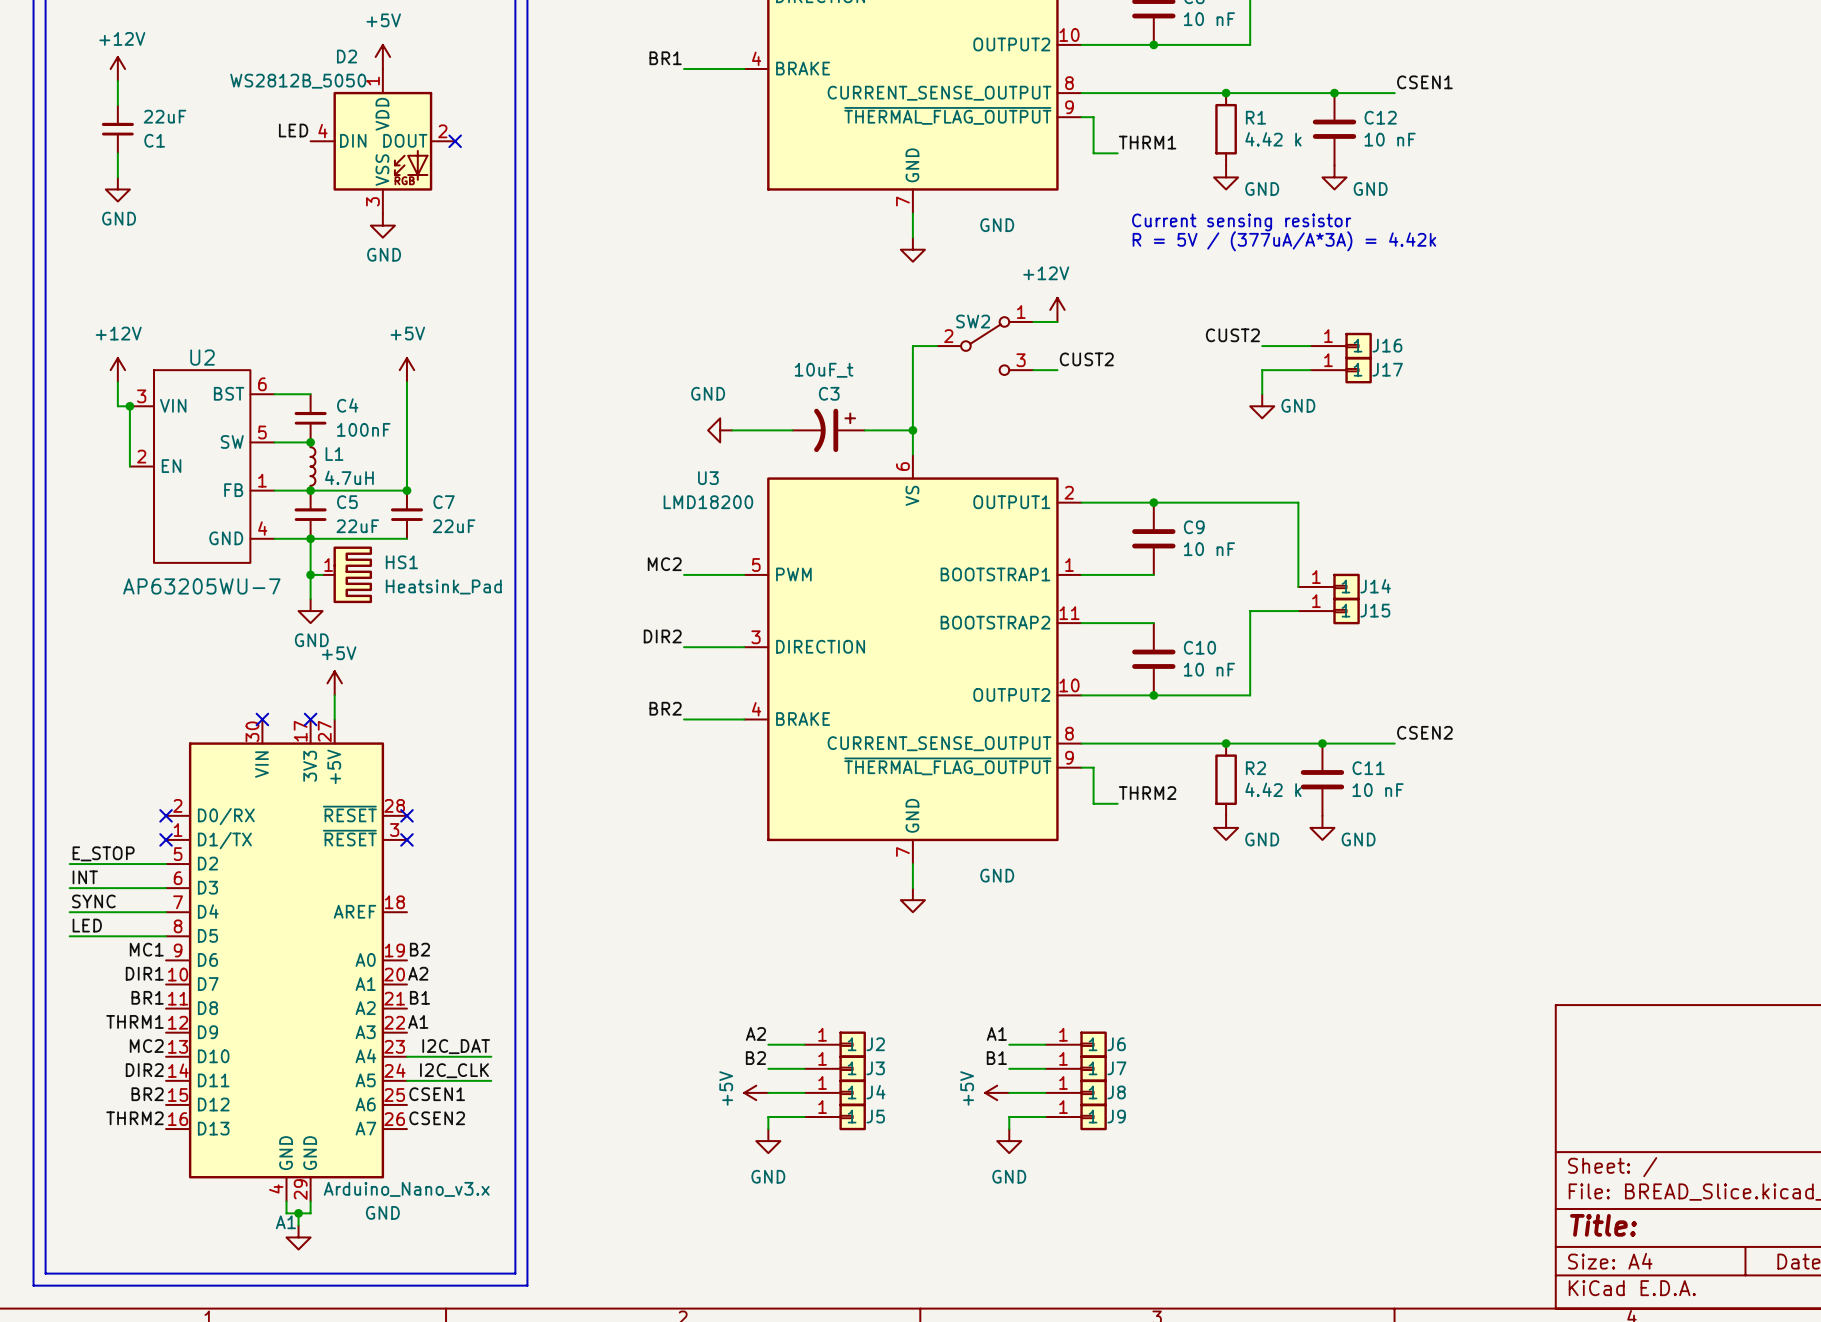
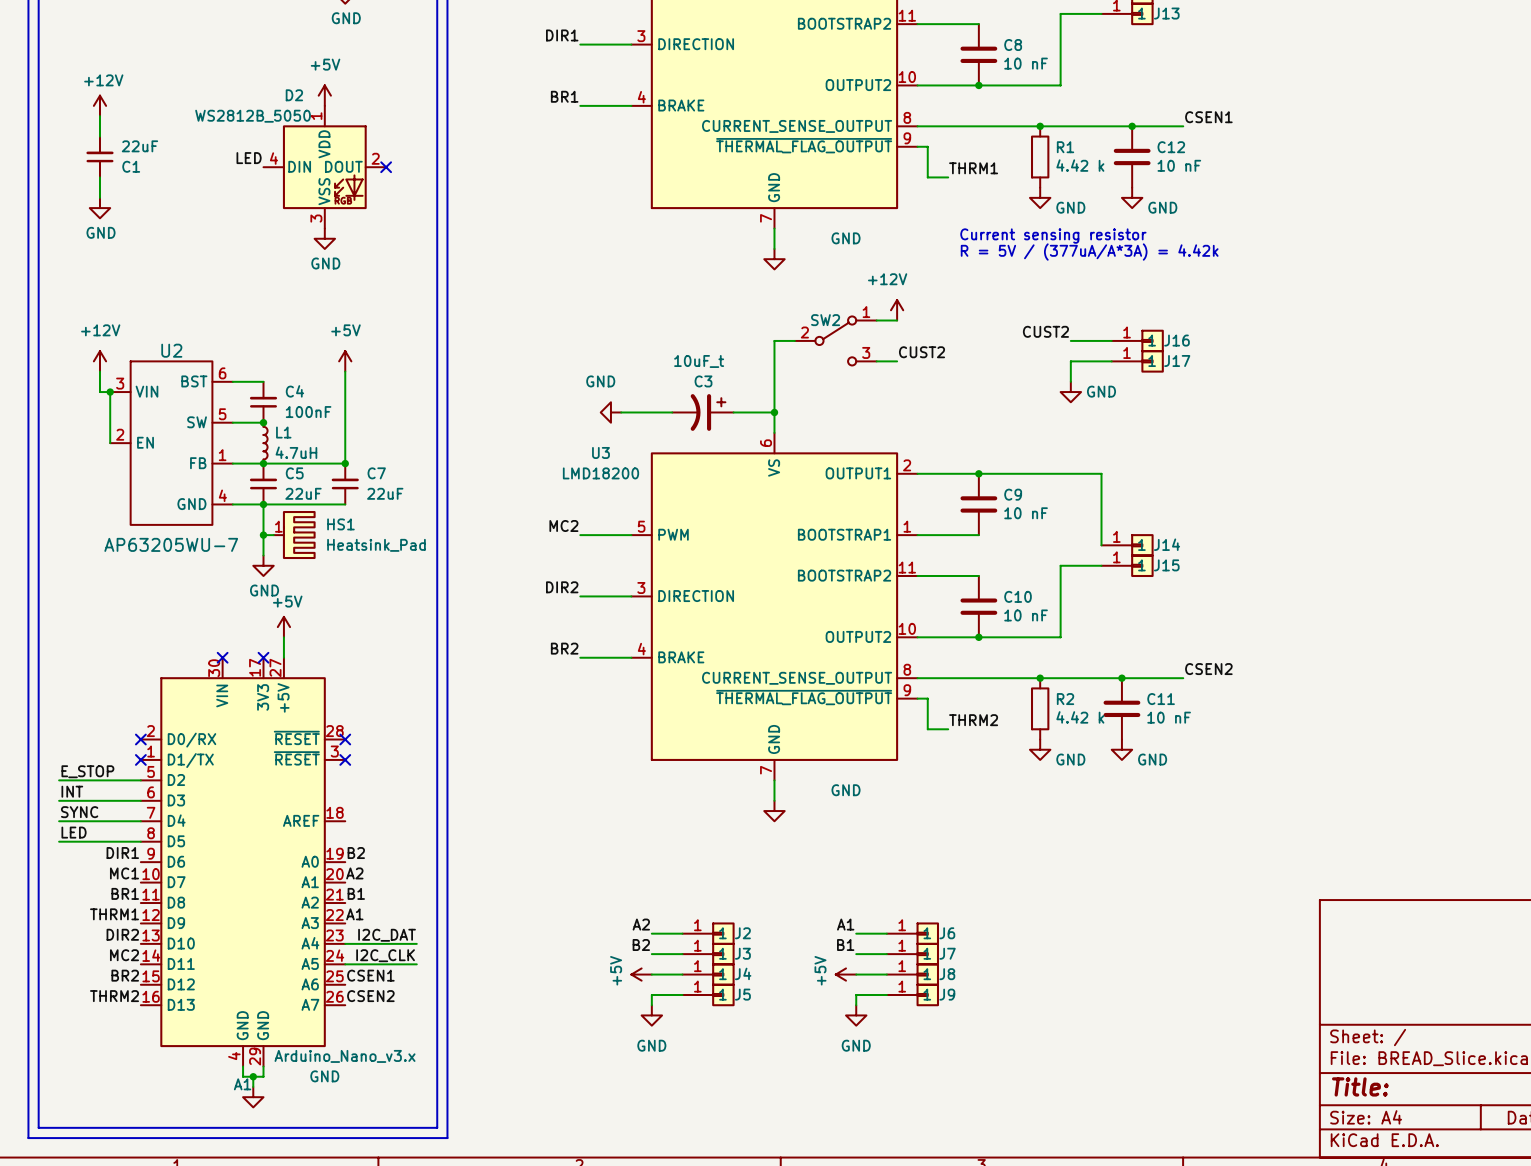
label: MC1 (146, 949) -> DIR1 (122, 853)
label: DIR1 (144, 973) -> MC1 (124, 873)
label: MC2 (146, 1046) -> DIR2 (122, 934)
label: DIR2 (144, 1070) -> MC2 (124, 955)

